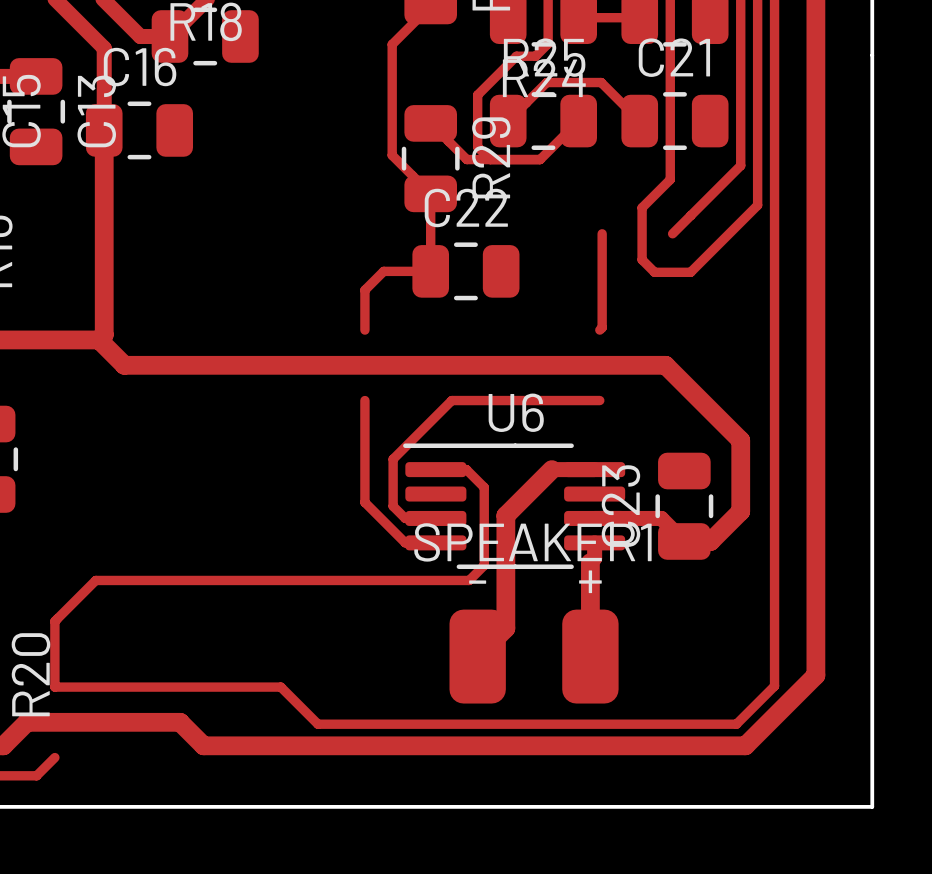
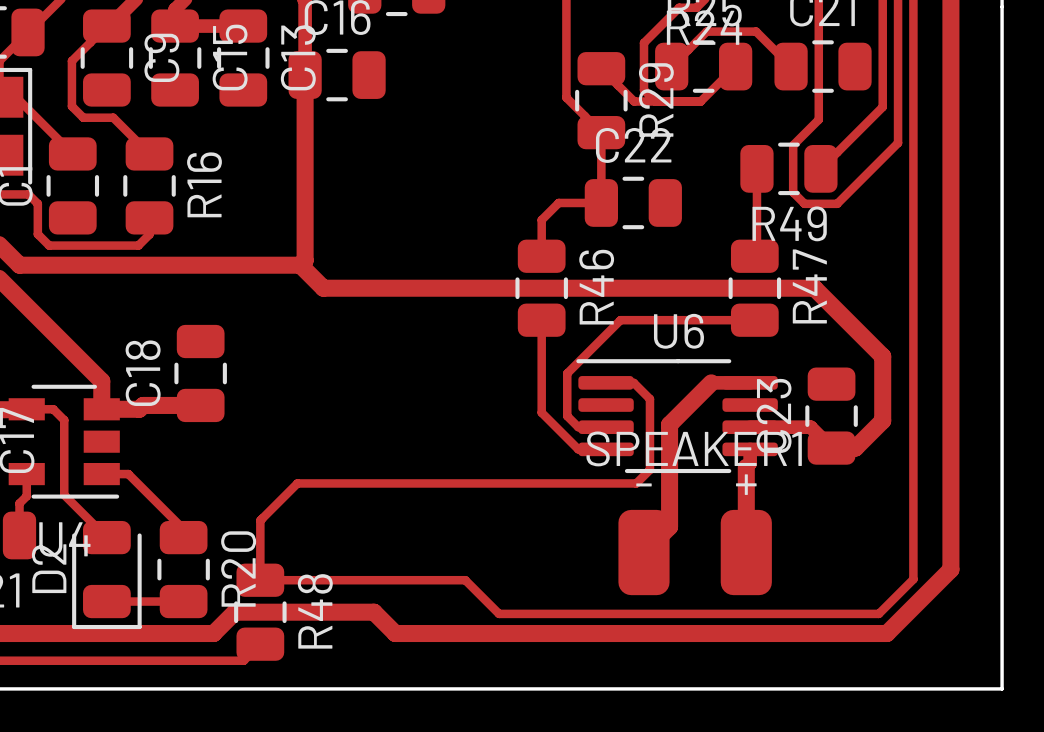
R49: none -> (788, 168)
R46: none -> (541, 288)
R47: none -> (754, 288)
R48: none -> (260, 612)

